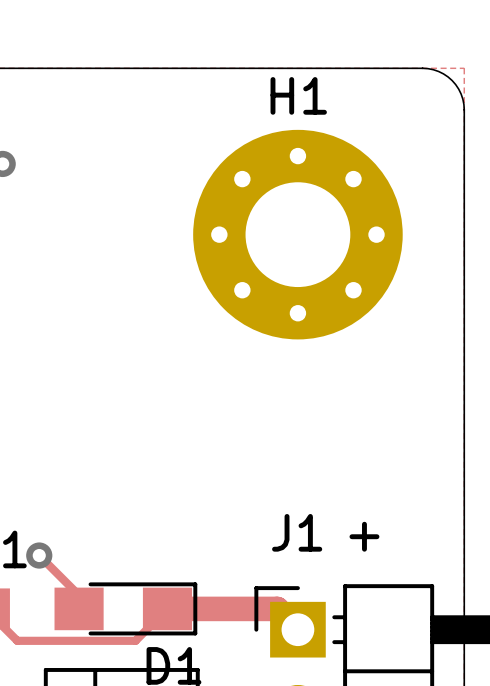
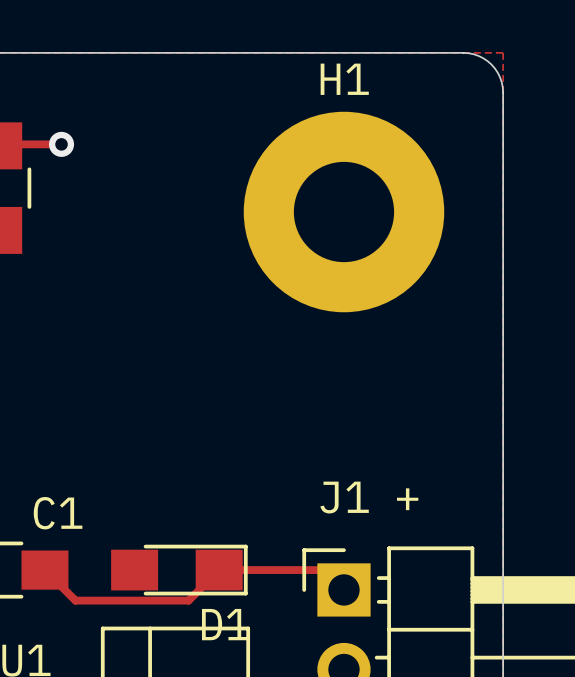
H1 footprint: [193, 129, 403, 340] -> [243, 111, 445, 313]
track: (39, 555) (79, 595) (79, 608) -> none
via: (39, 555) -> none
track width: thick (167, 608) (277, 608) (297, 629) -> thin (219, 570) (324, 570) (343, 589)

